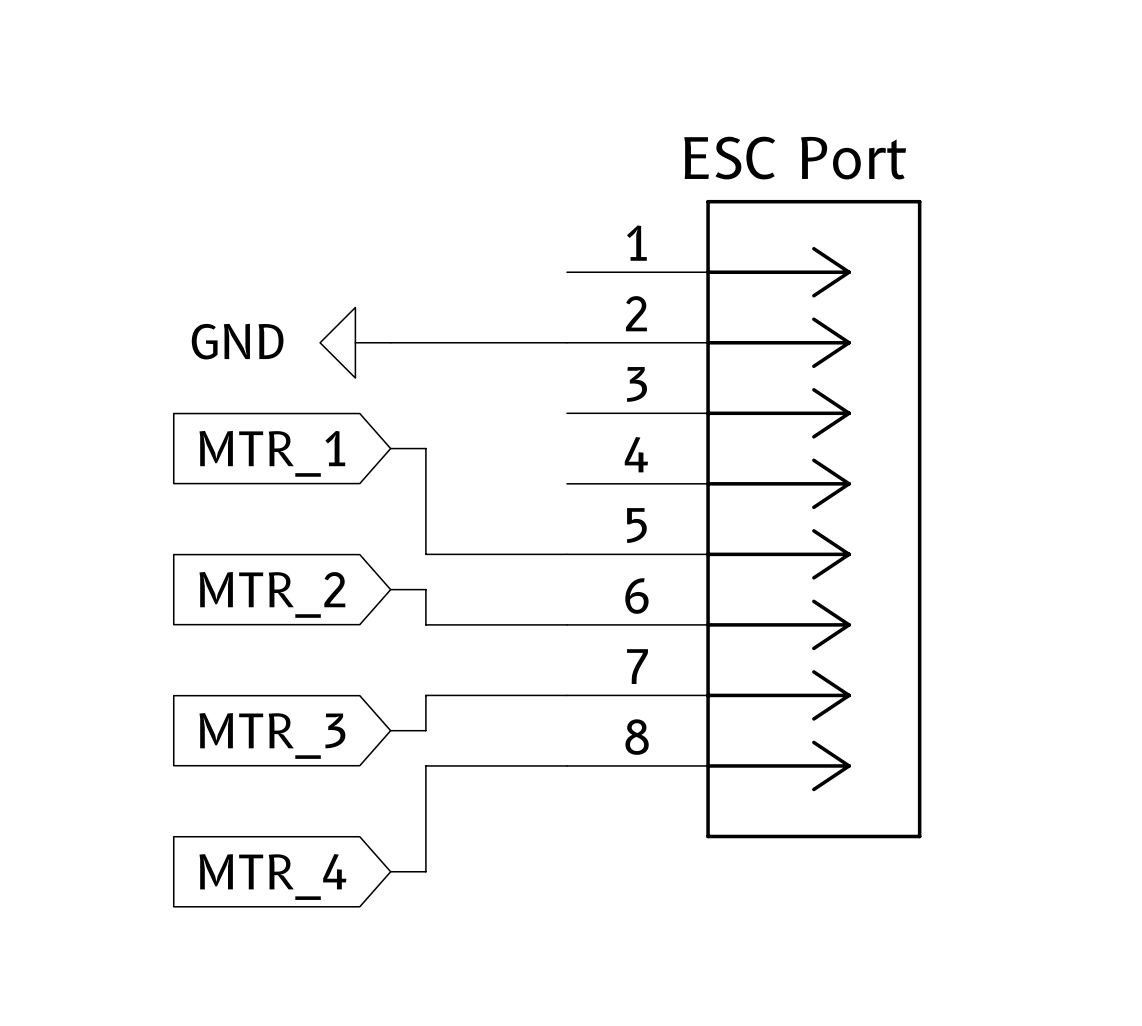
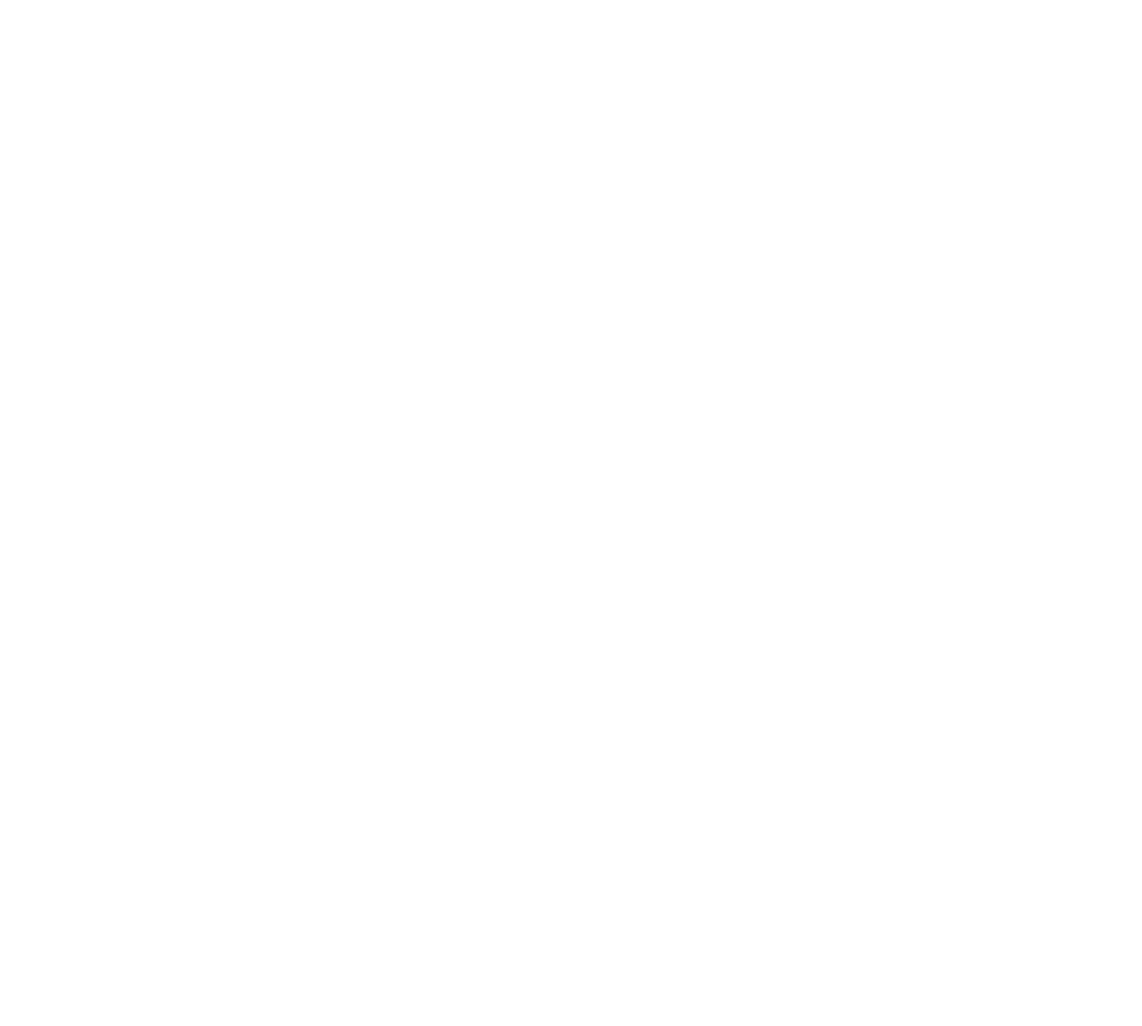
power symbol: GND (355, 342) -> none
wire: (390, 342) (566, 342) -> none
wire: (390, 448) (425, 448) (425, 554) (566, 554) -> none
global label: MTR_1 (272, 453) -> none
part: ESC Port (744, 519) -> none
wire: (390, 589) (425, 589) (425, 624) (566, 624) -> none
global label: MTR_2 (272, 594) -> none
wire: (566, 695) (425, 695) (425, 730) (390, 730) -> none
global label: MTR_3 (272, 735) -> none
wire: (566, 765) (425, 765) (425, 871) (390, 871) -> none
global label: MTR_4 (272, 877) -> none

